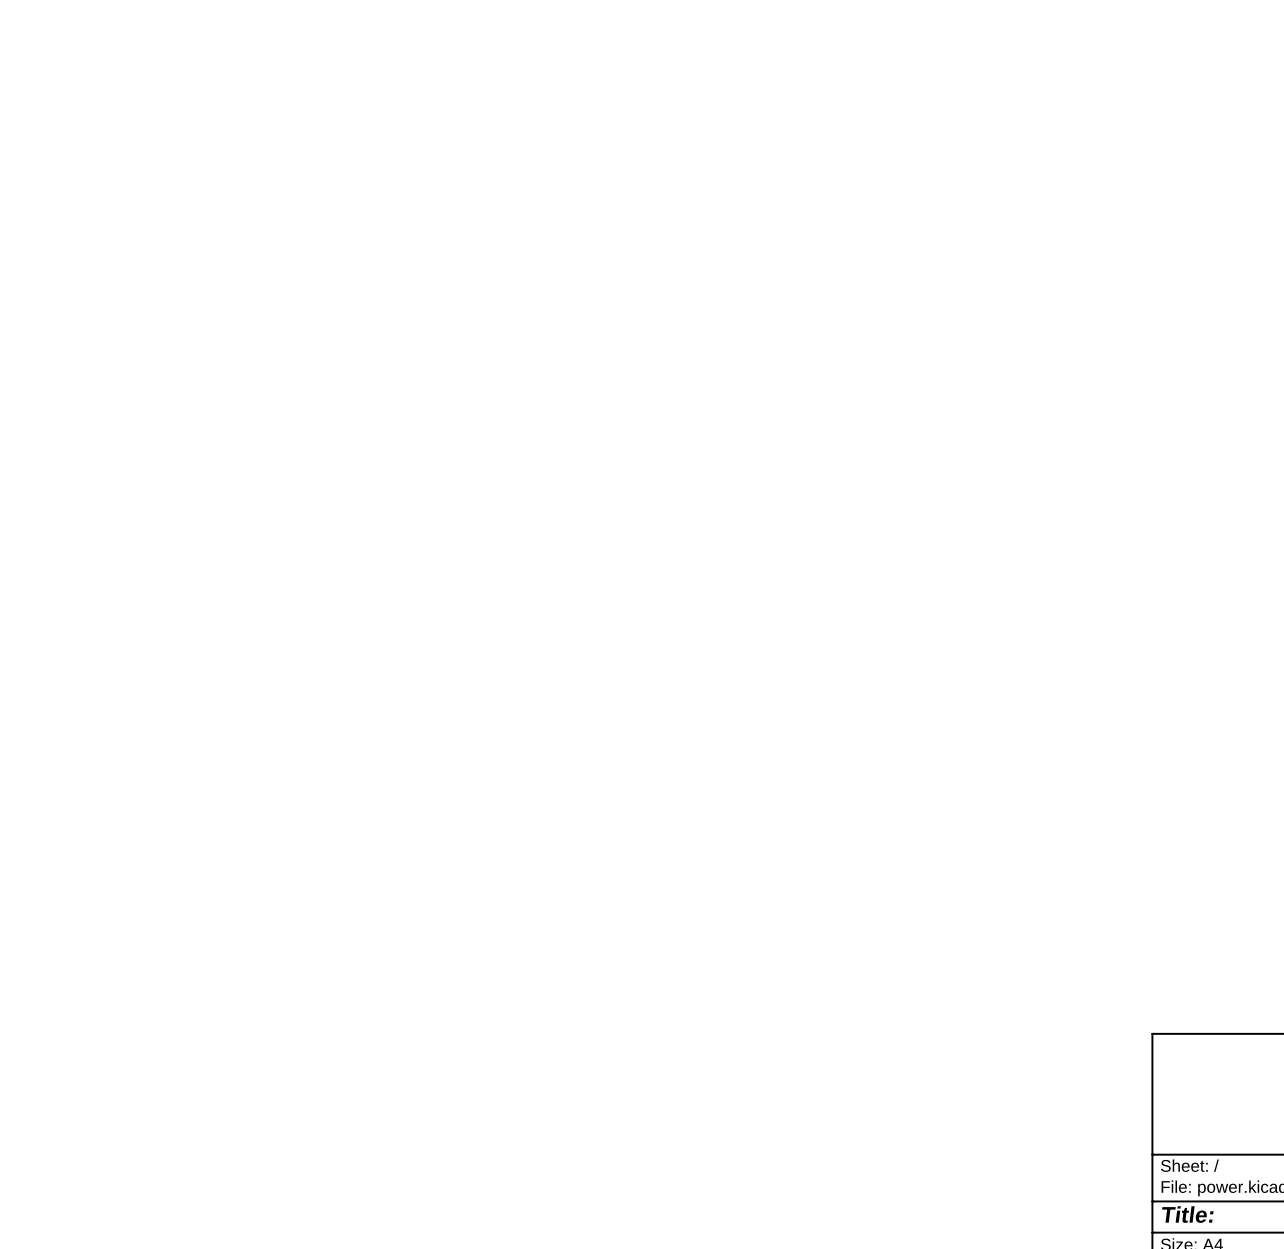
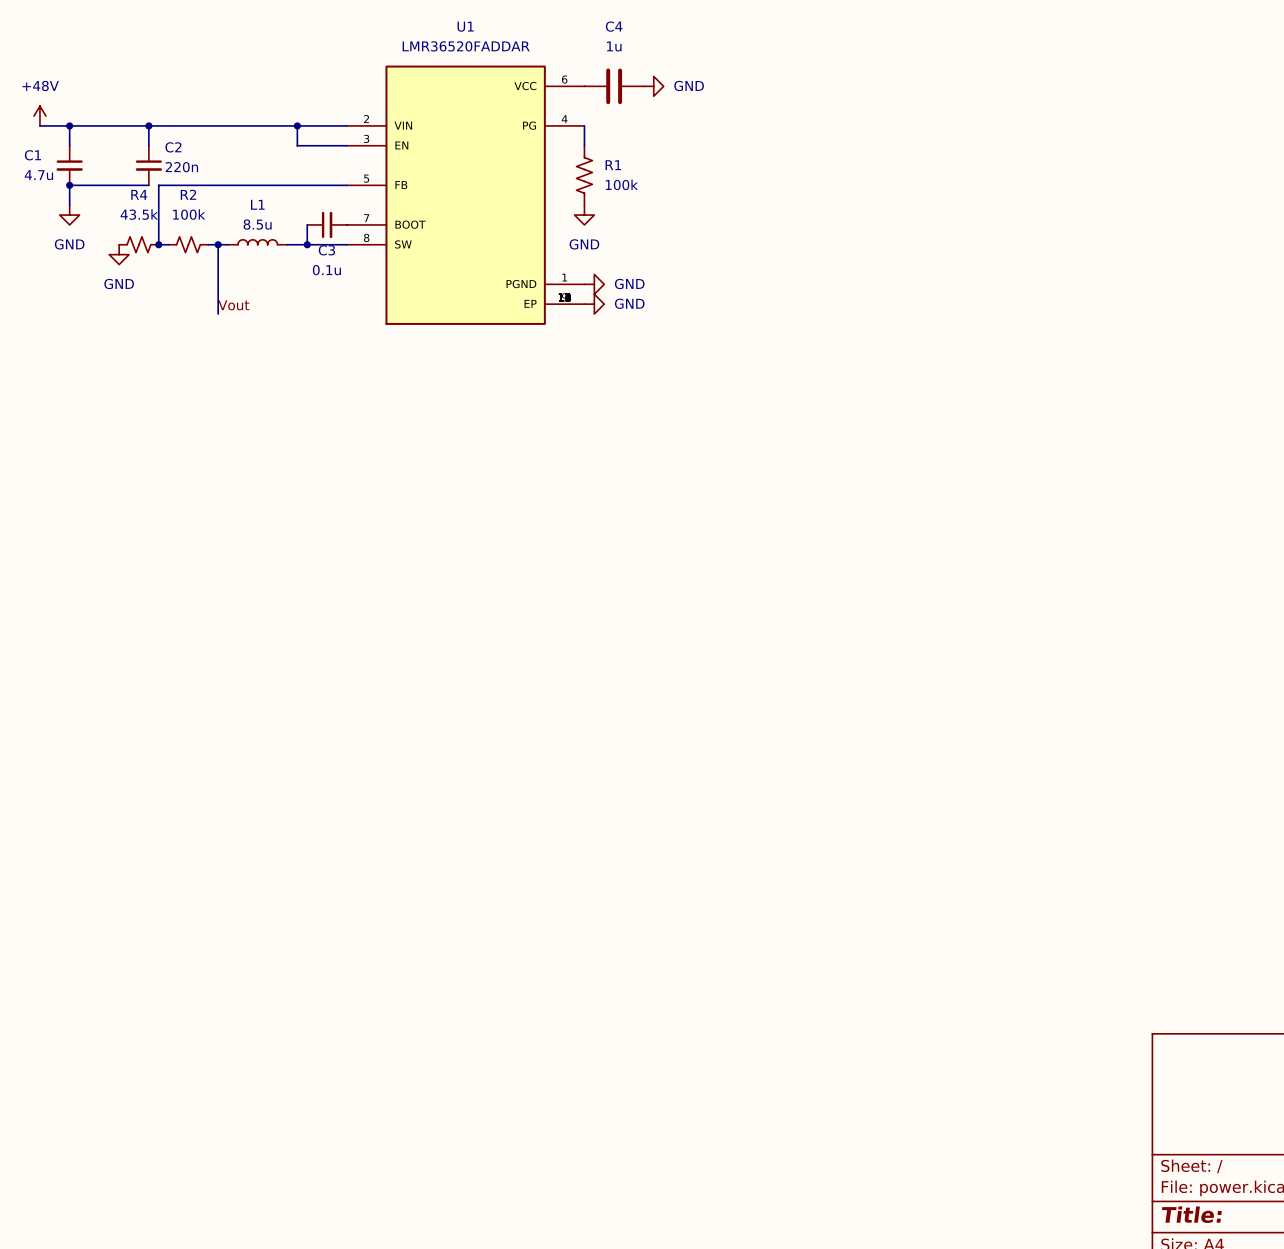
C4: none -> 1u (614, 86)
power symbol: none -> GND (653, 86)
power symbol: none -> +48V (39, 116)
wire: none -> (39, 125) (346, 125)
wire: none -> (69, 125) (69, 145)
junction: none -> (69, 125)
wire: none -> (148, 125) (148, 145)
junction: none -> (148, 125)
wire: none -> (297, 125) (297, 145) (346, 145)
junction: none -> (297, 125)
wire: none -> (584, 125) (584, 145)
C1: none -> 4.7u (69, 165)
C2: none -> 220n (148, 165)
R1: none -> 100k (584, 175)
junction: none -> (69, 185)
wire: none -> (148, 185) (69, 185) (69, 205)
wire: none -> (346, 185) (158, 185) (158, 244) (168, 244)
U1: none -> LMR36520FADDAR (465, 195)
power symbol: none -> GND (69, 215)
power symbol: none -> GND (584, 215)
wire: none -> (307, 224) (307, 244)
C3: none -> 0.1u (327, 224)
L1: none -> 8.5u (257, 242)
R4: none -> 43.5k (138, 244)
junction: none -> (158, 244)
R2: none -> 100k (188, 244)
wire: none -> (208, 244) (228, 244)
wire: none -> (218, 244) (218, 314)
junction: none -> (218, 244)
wire: none -> (287, 244) (346, 244)
junction: none -> (307, 244)
power symbol: none -> GND (119, 254)
power symbol: none -> GND (594, 284)
power symbol: none -> GND (594, 304)
label: none -> Vout (233, 305)

